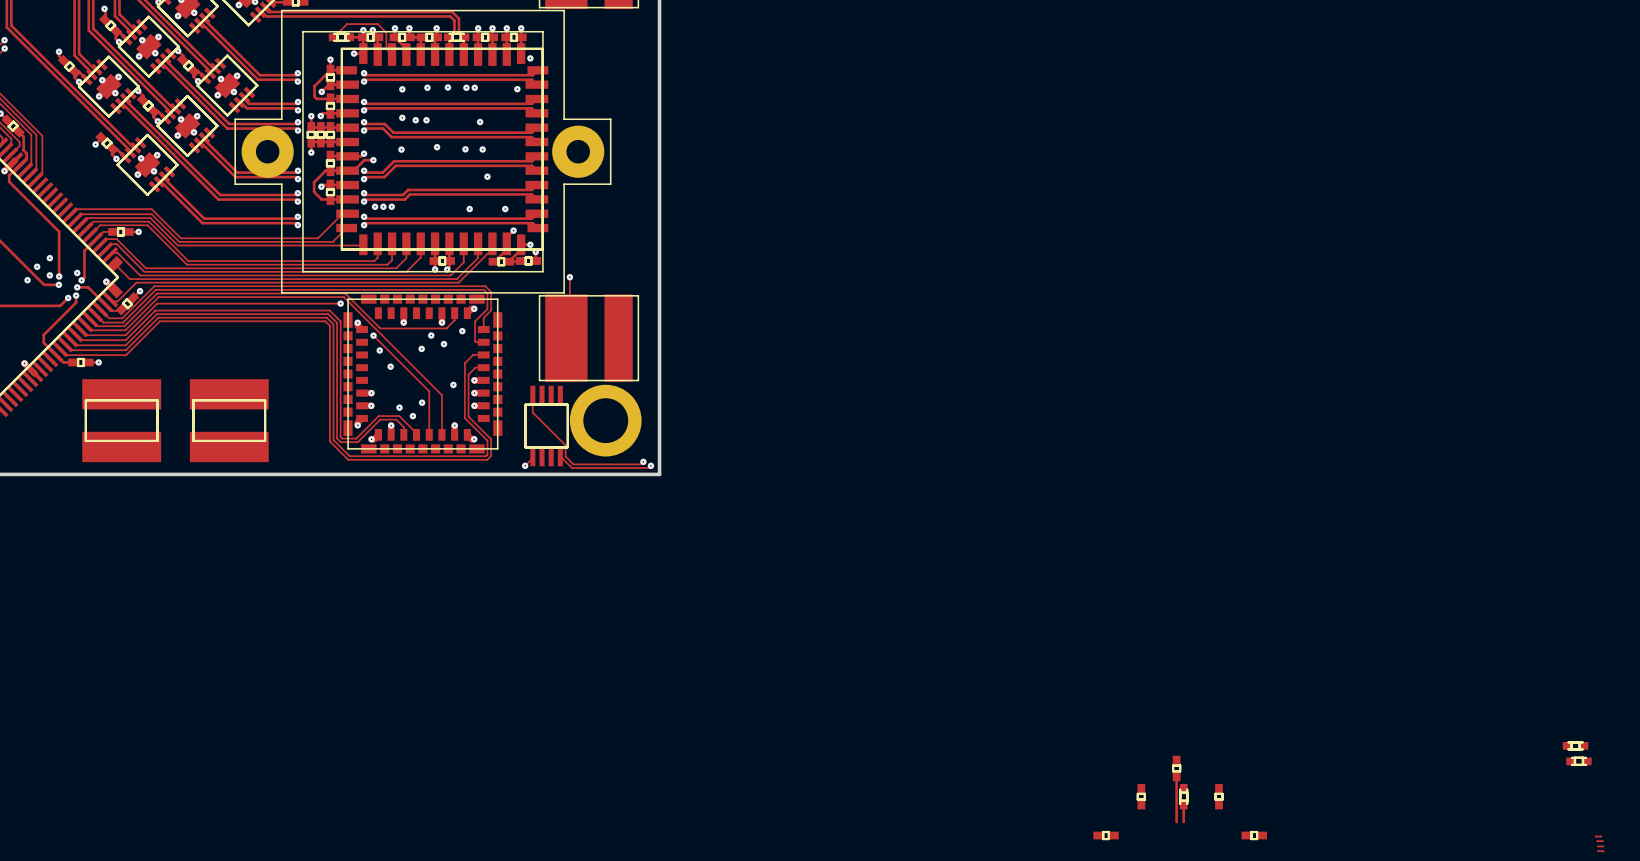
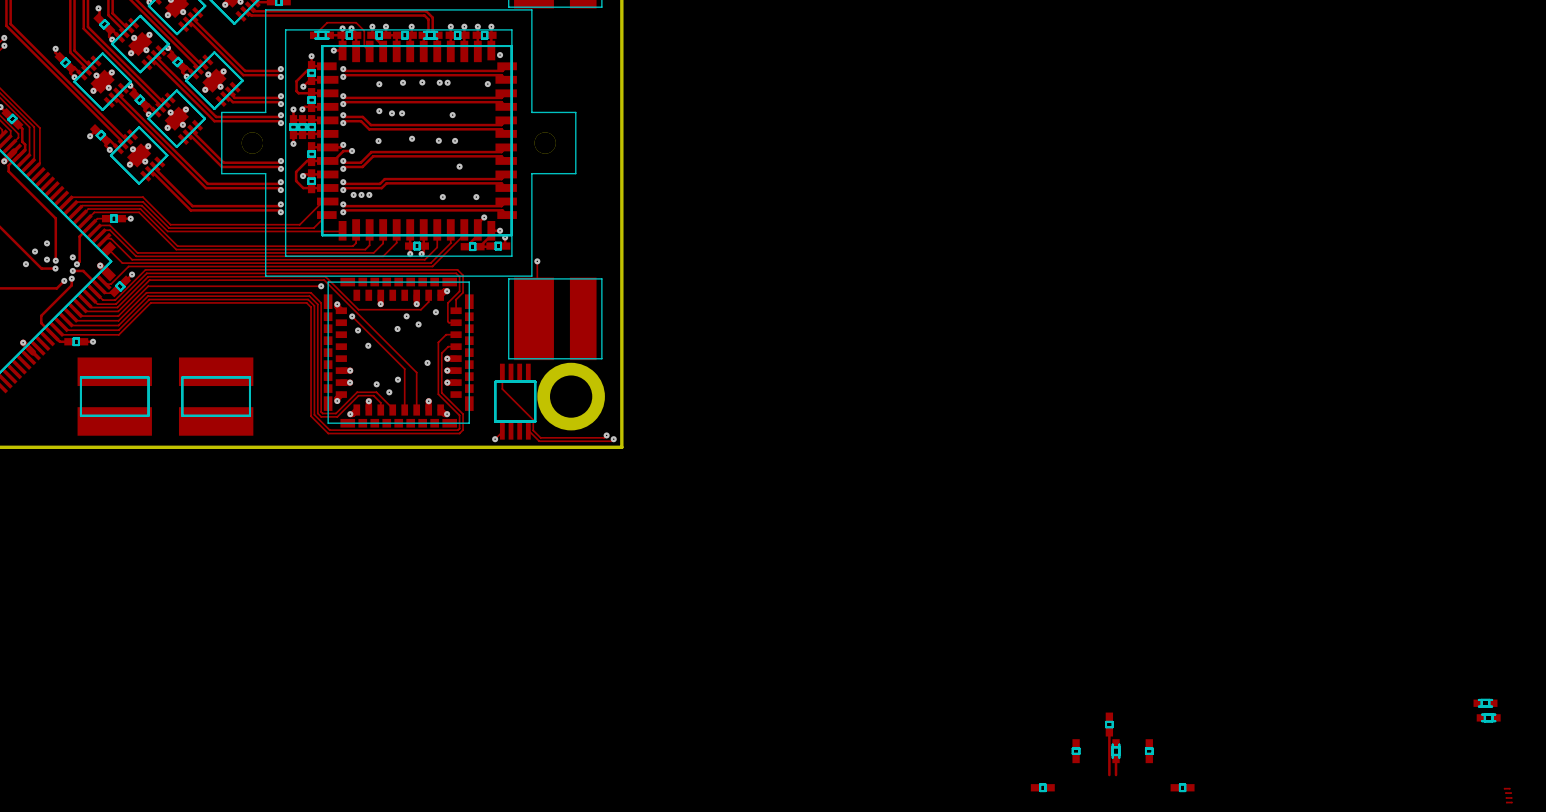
part footprint: [234, 9, 612, 294] -> [221, 9, 577, 277]

